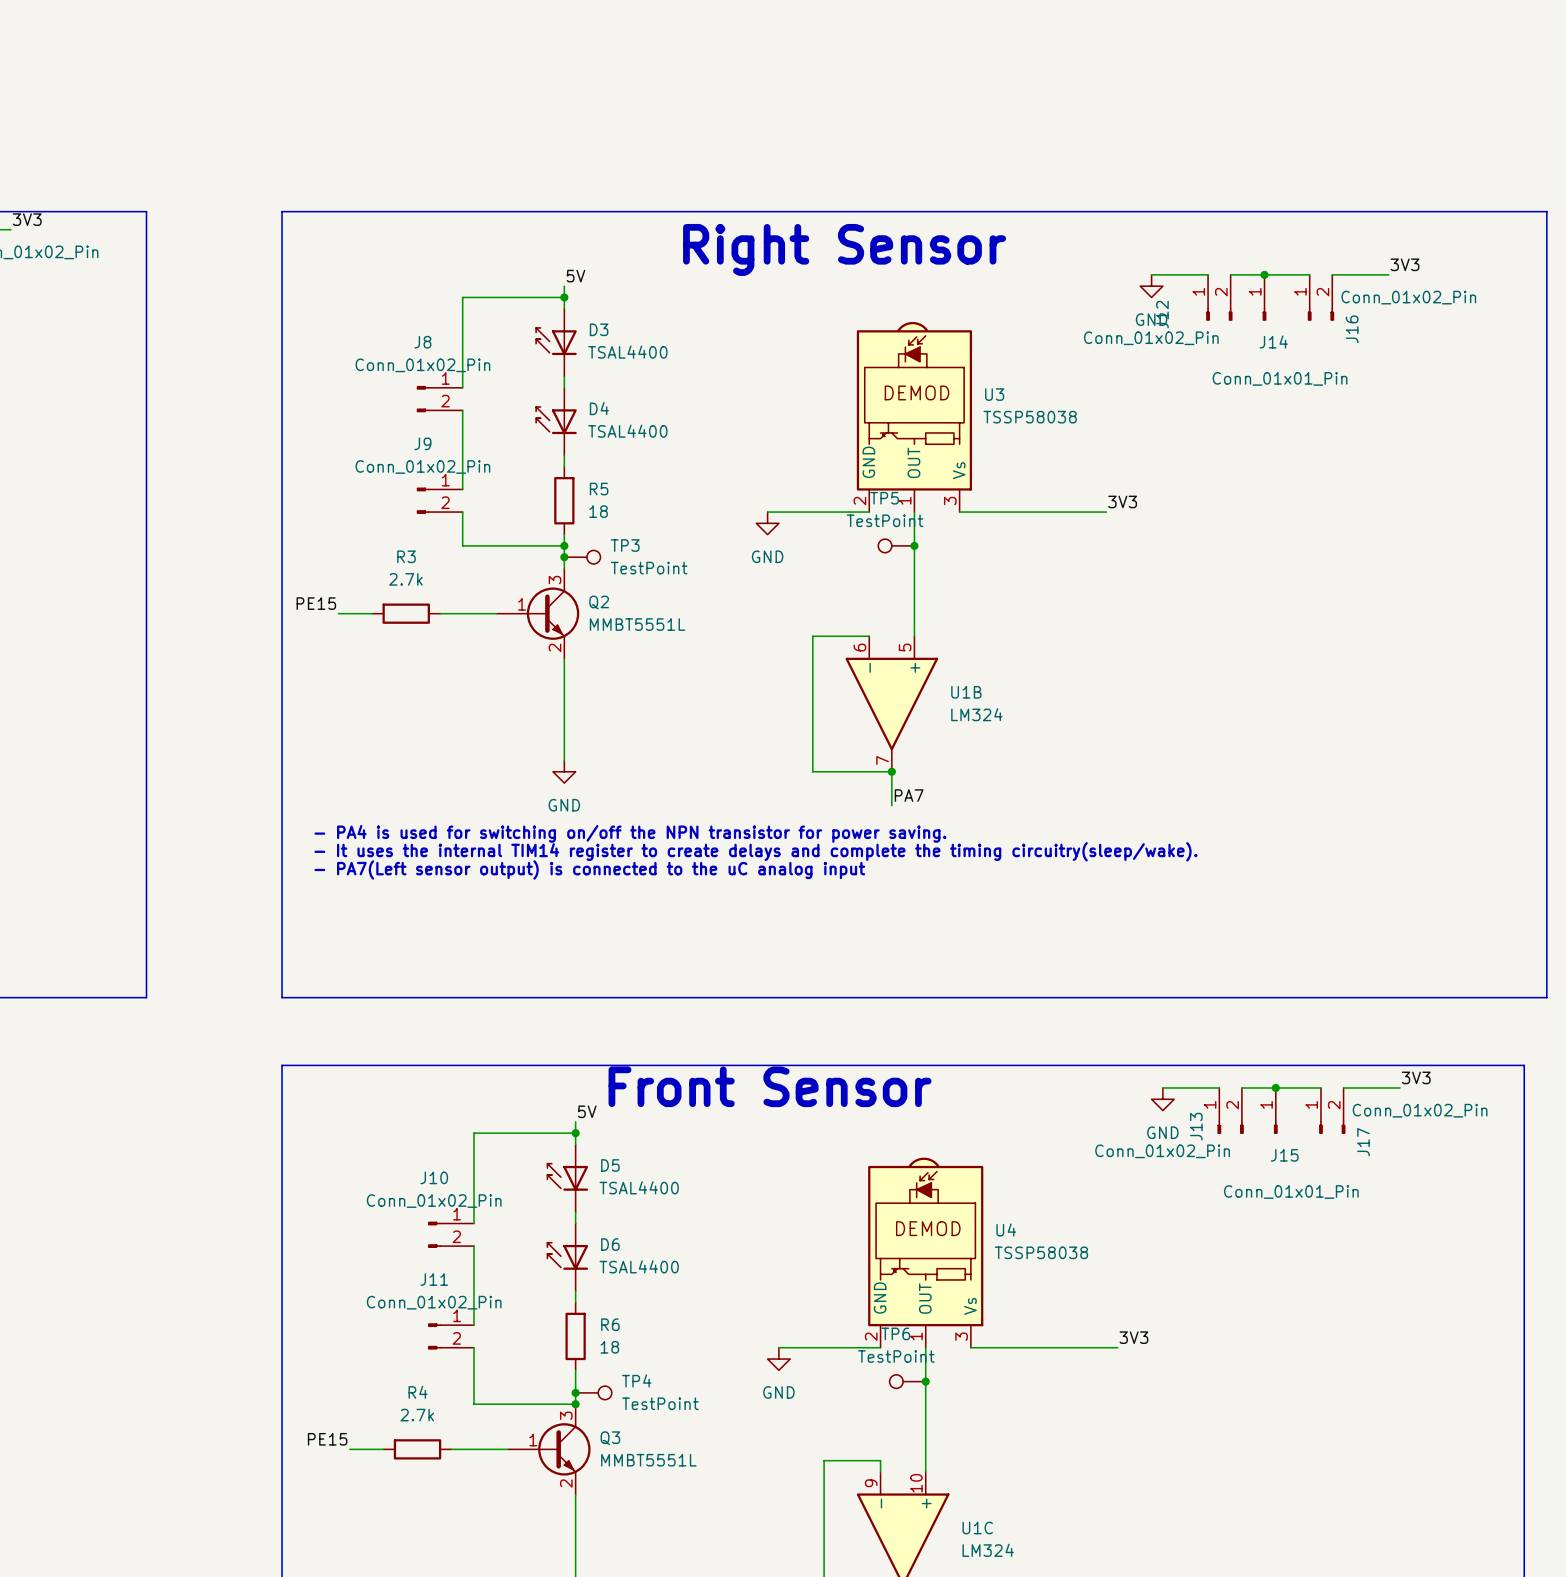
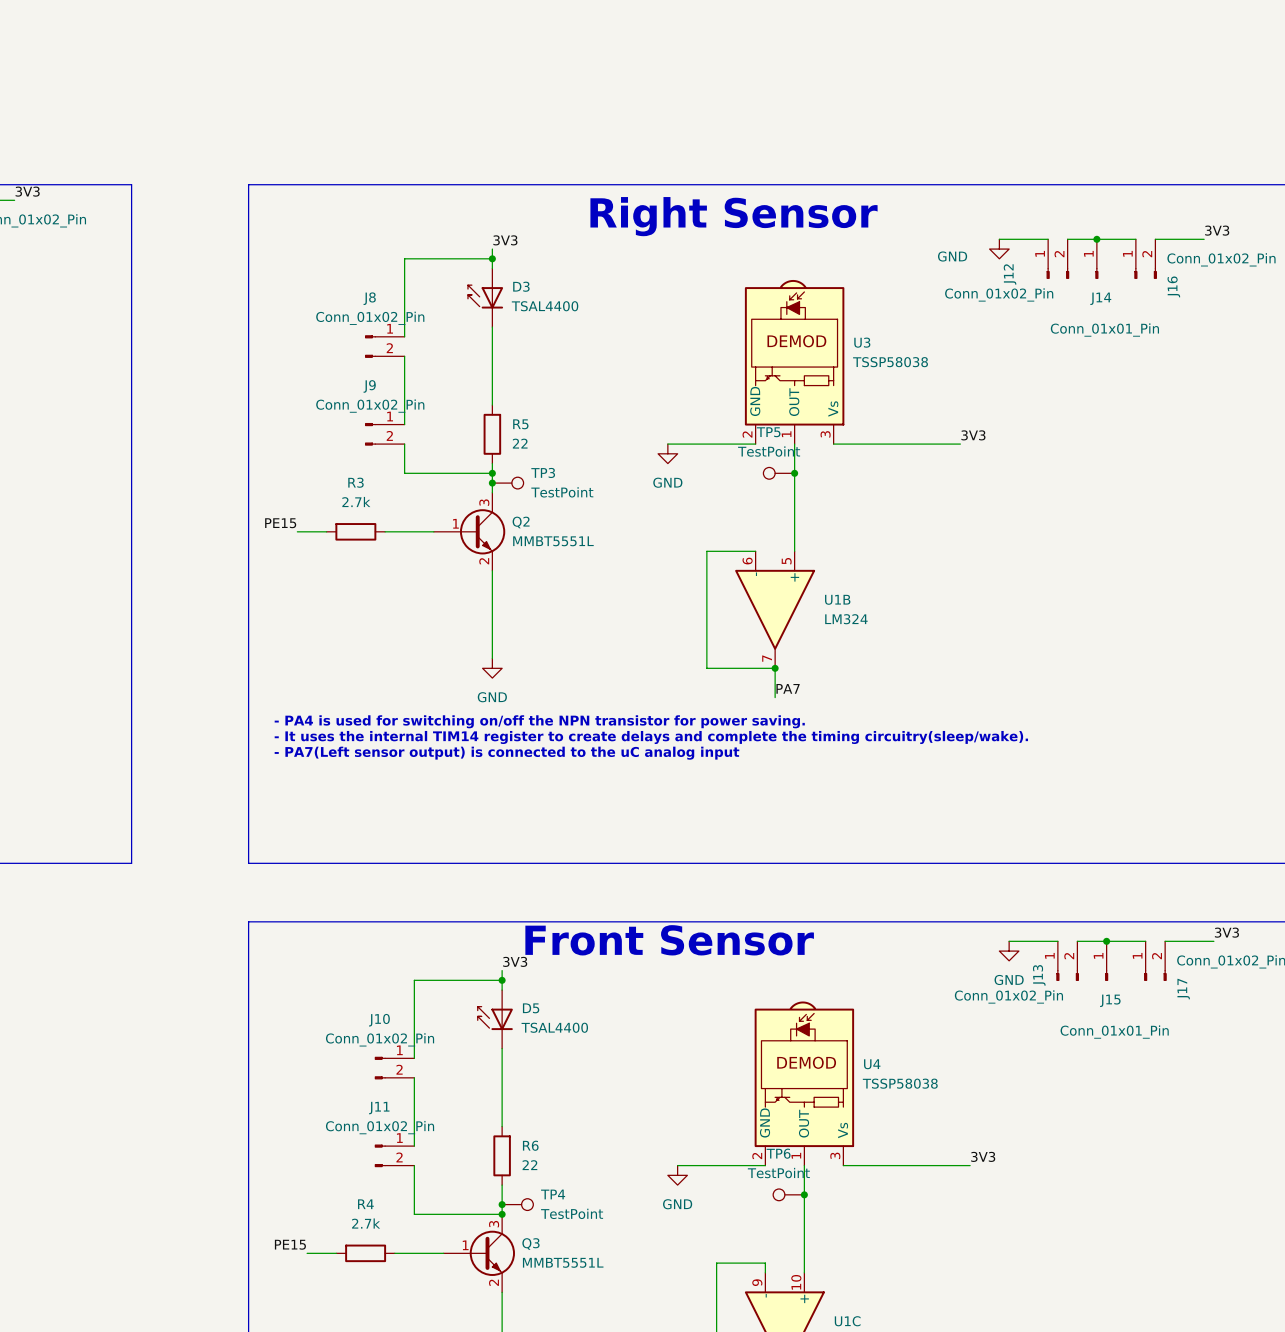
label: 5V (575, 276) -> 3V3 (505, 240)
power symbol text position: GND (1151, 319) -> GND (952, 256)
D4: TSAL4400 (556, 421) -> none
R5 value: 18 (598, 511) -> 22 (520, 443)
label: 5V (587, 1111) -> 3V3 (515, 961)
D6: TSAL4400 (567, 1257) -> none
R6 value: 18 (609, 1347) -> 22 (529, 1165)

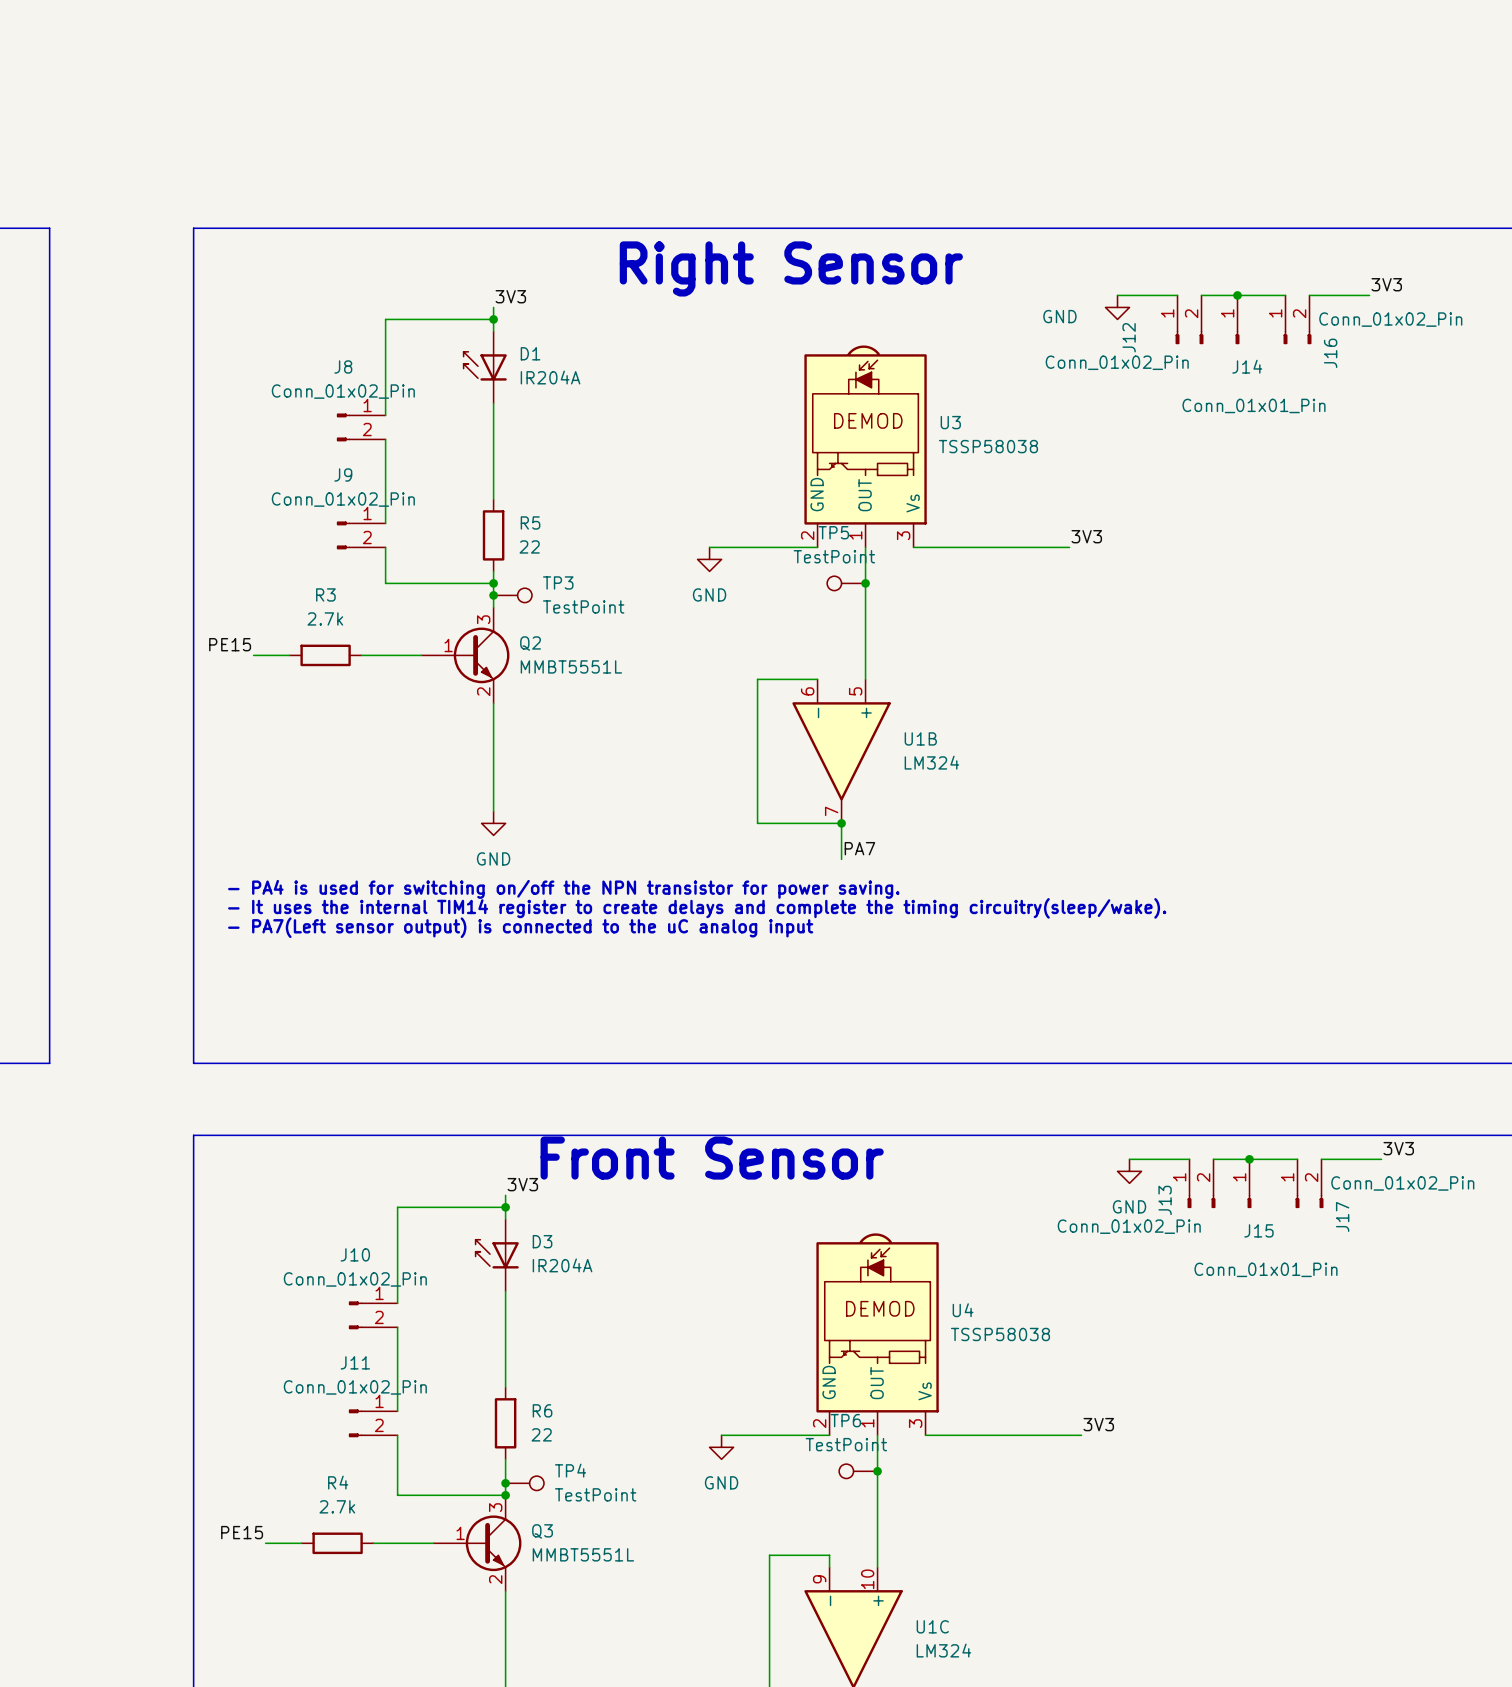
D3 name: D3 (521, 286) -> D1 (530, 353)
D3 value: TSAL4400 (545, 306) -> IR204A (550, 377)
D5 name: D5 (531, 1008) -> D3 (542, 1241)
D5 value: TSAL4400 (554, 1027) -> IR204A (562, 1265)

